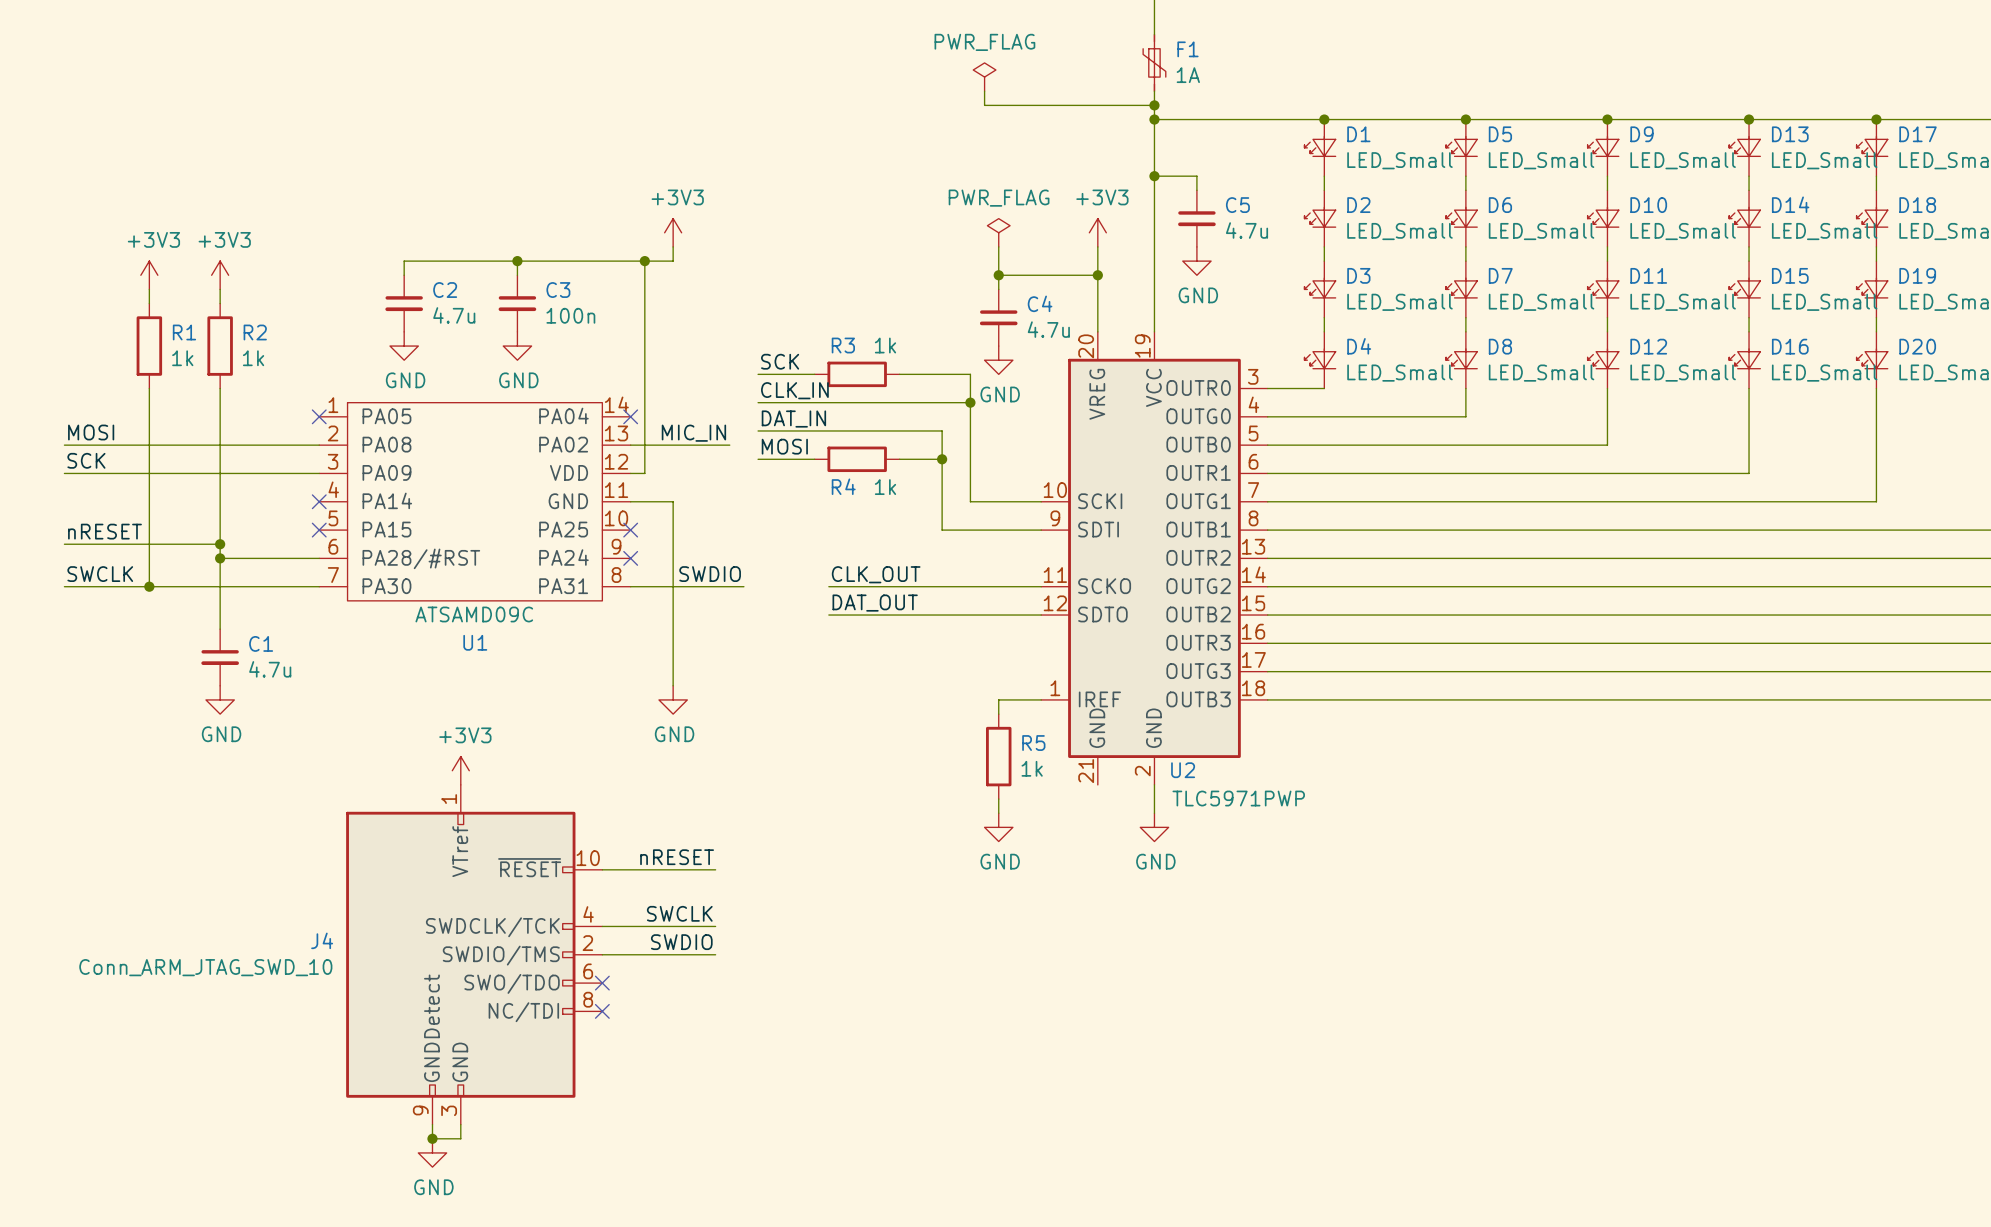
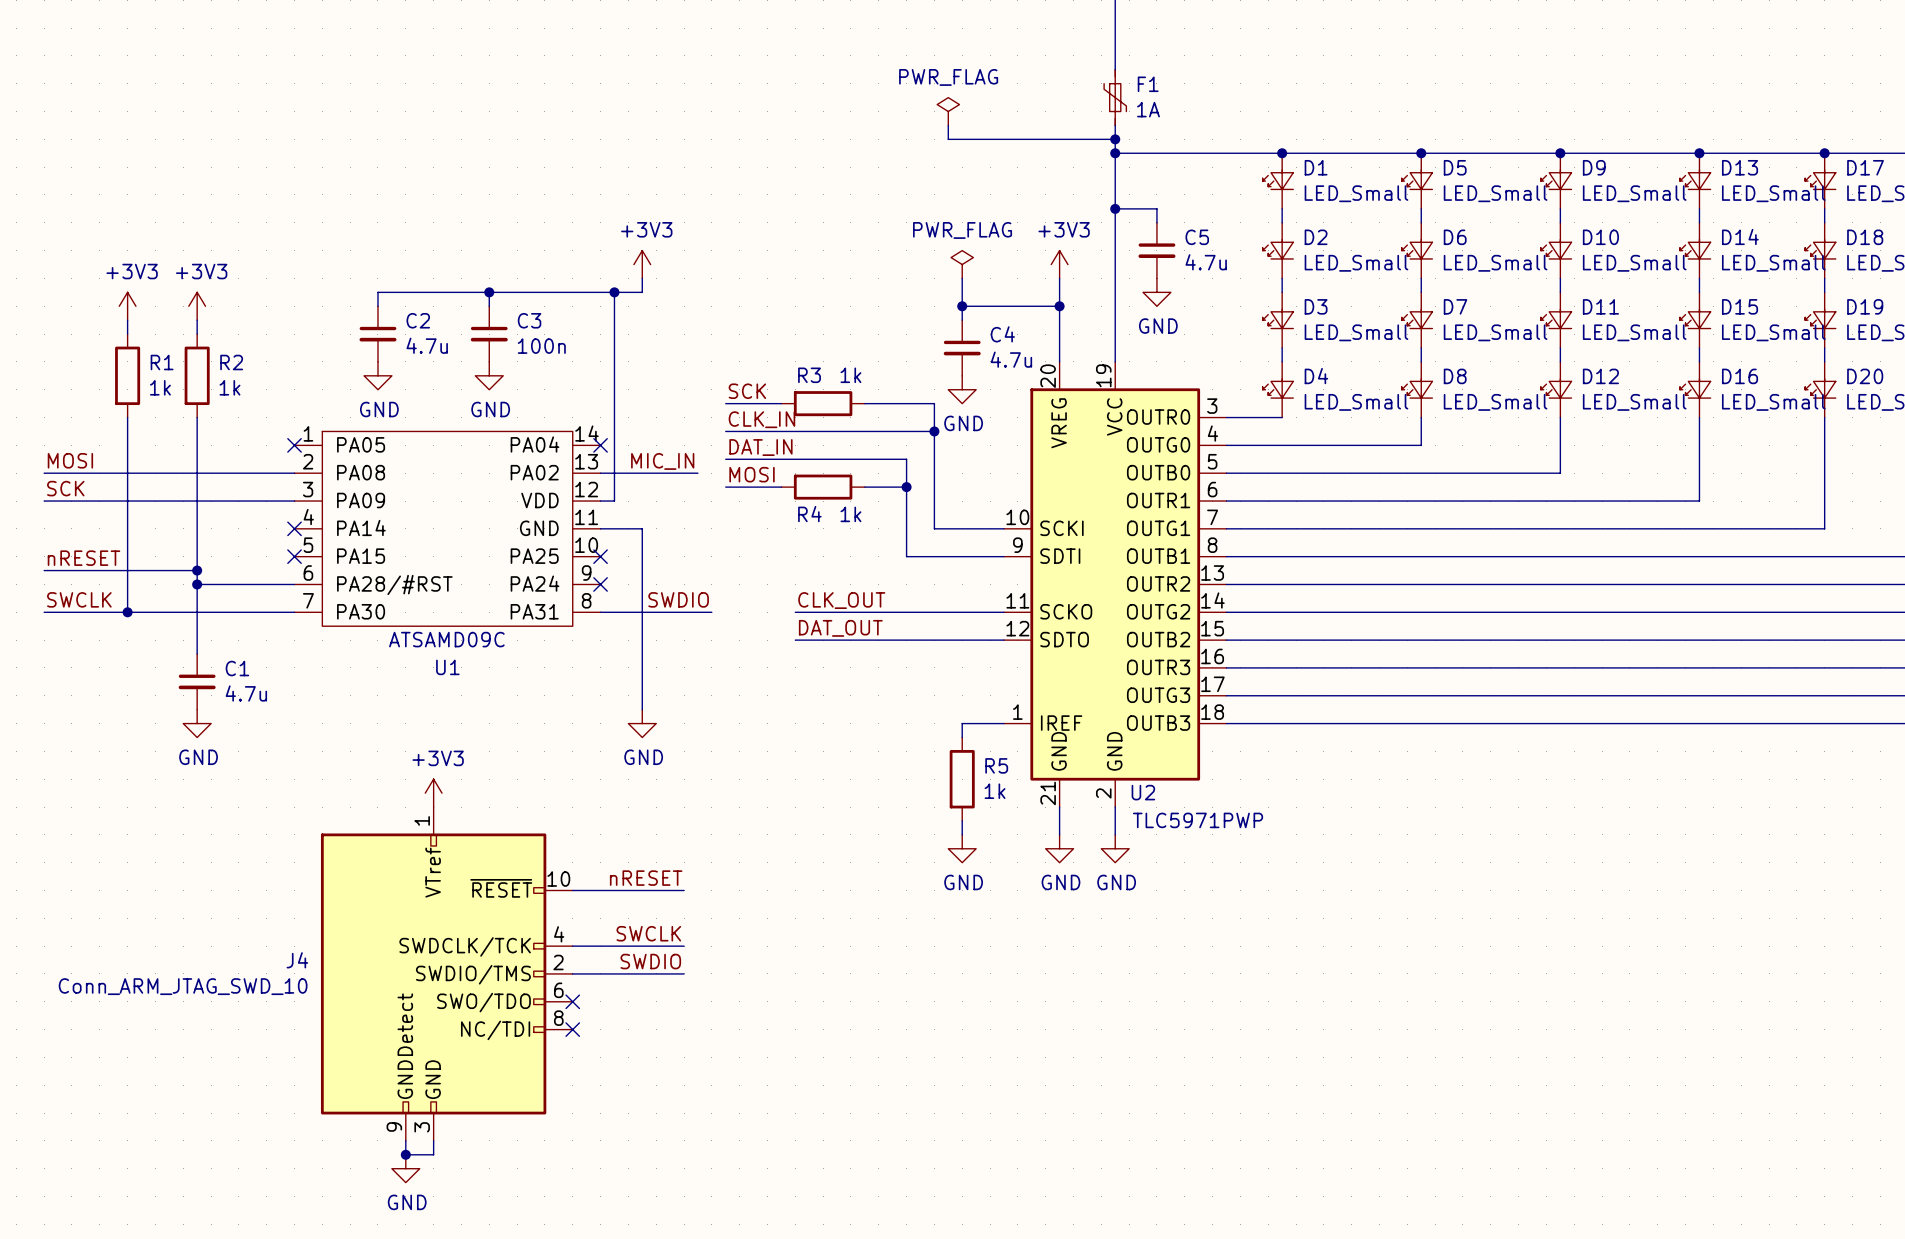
wire: none -> (1059, 807) (1059, 834)
power symbol: none -> GND (1059, 848)

